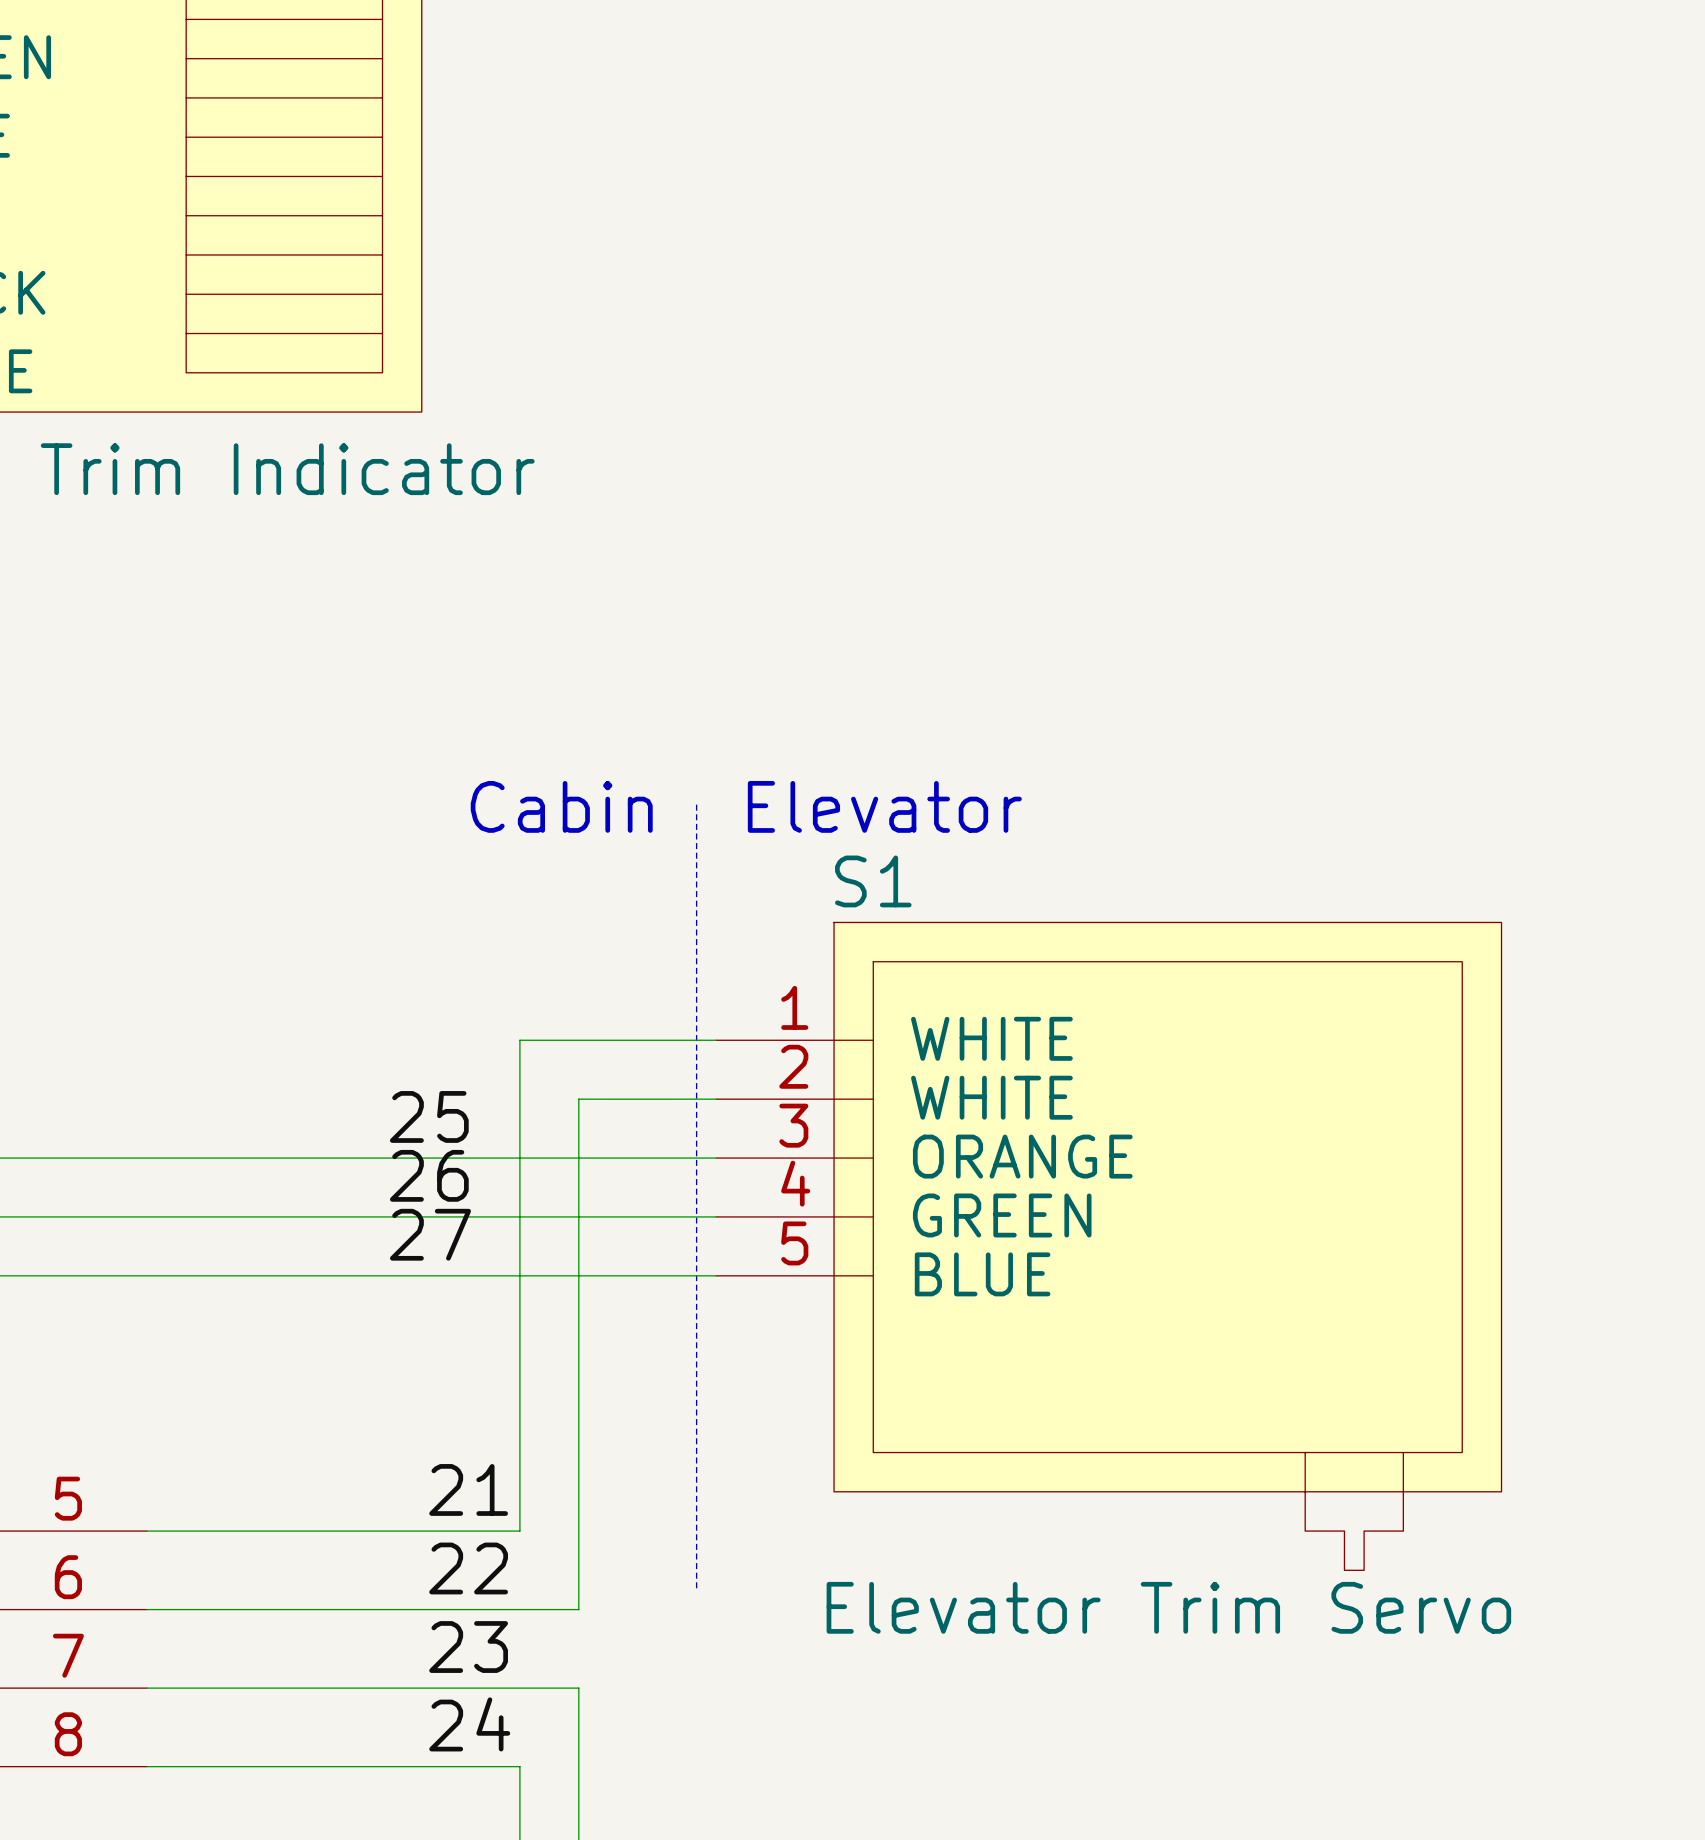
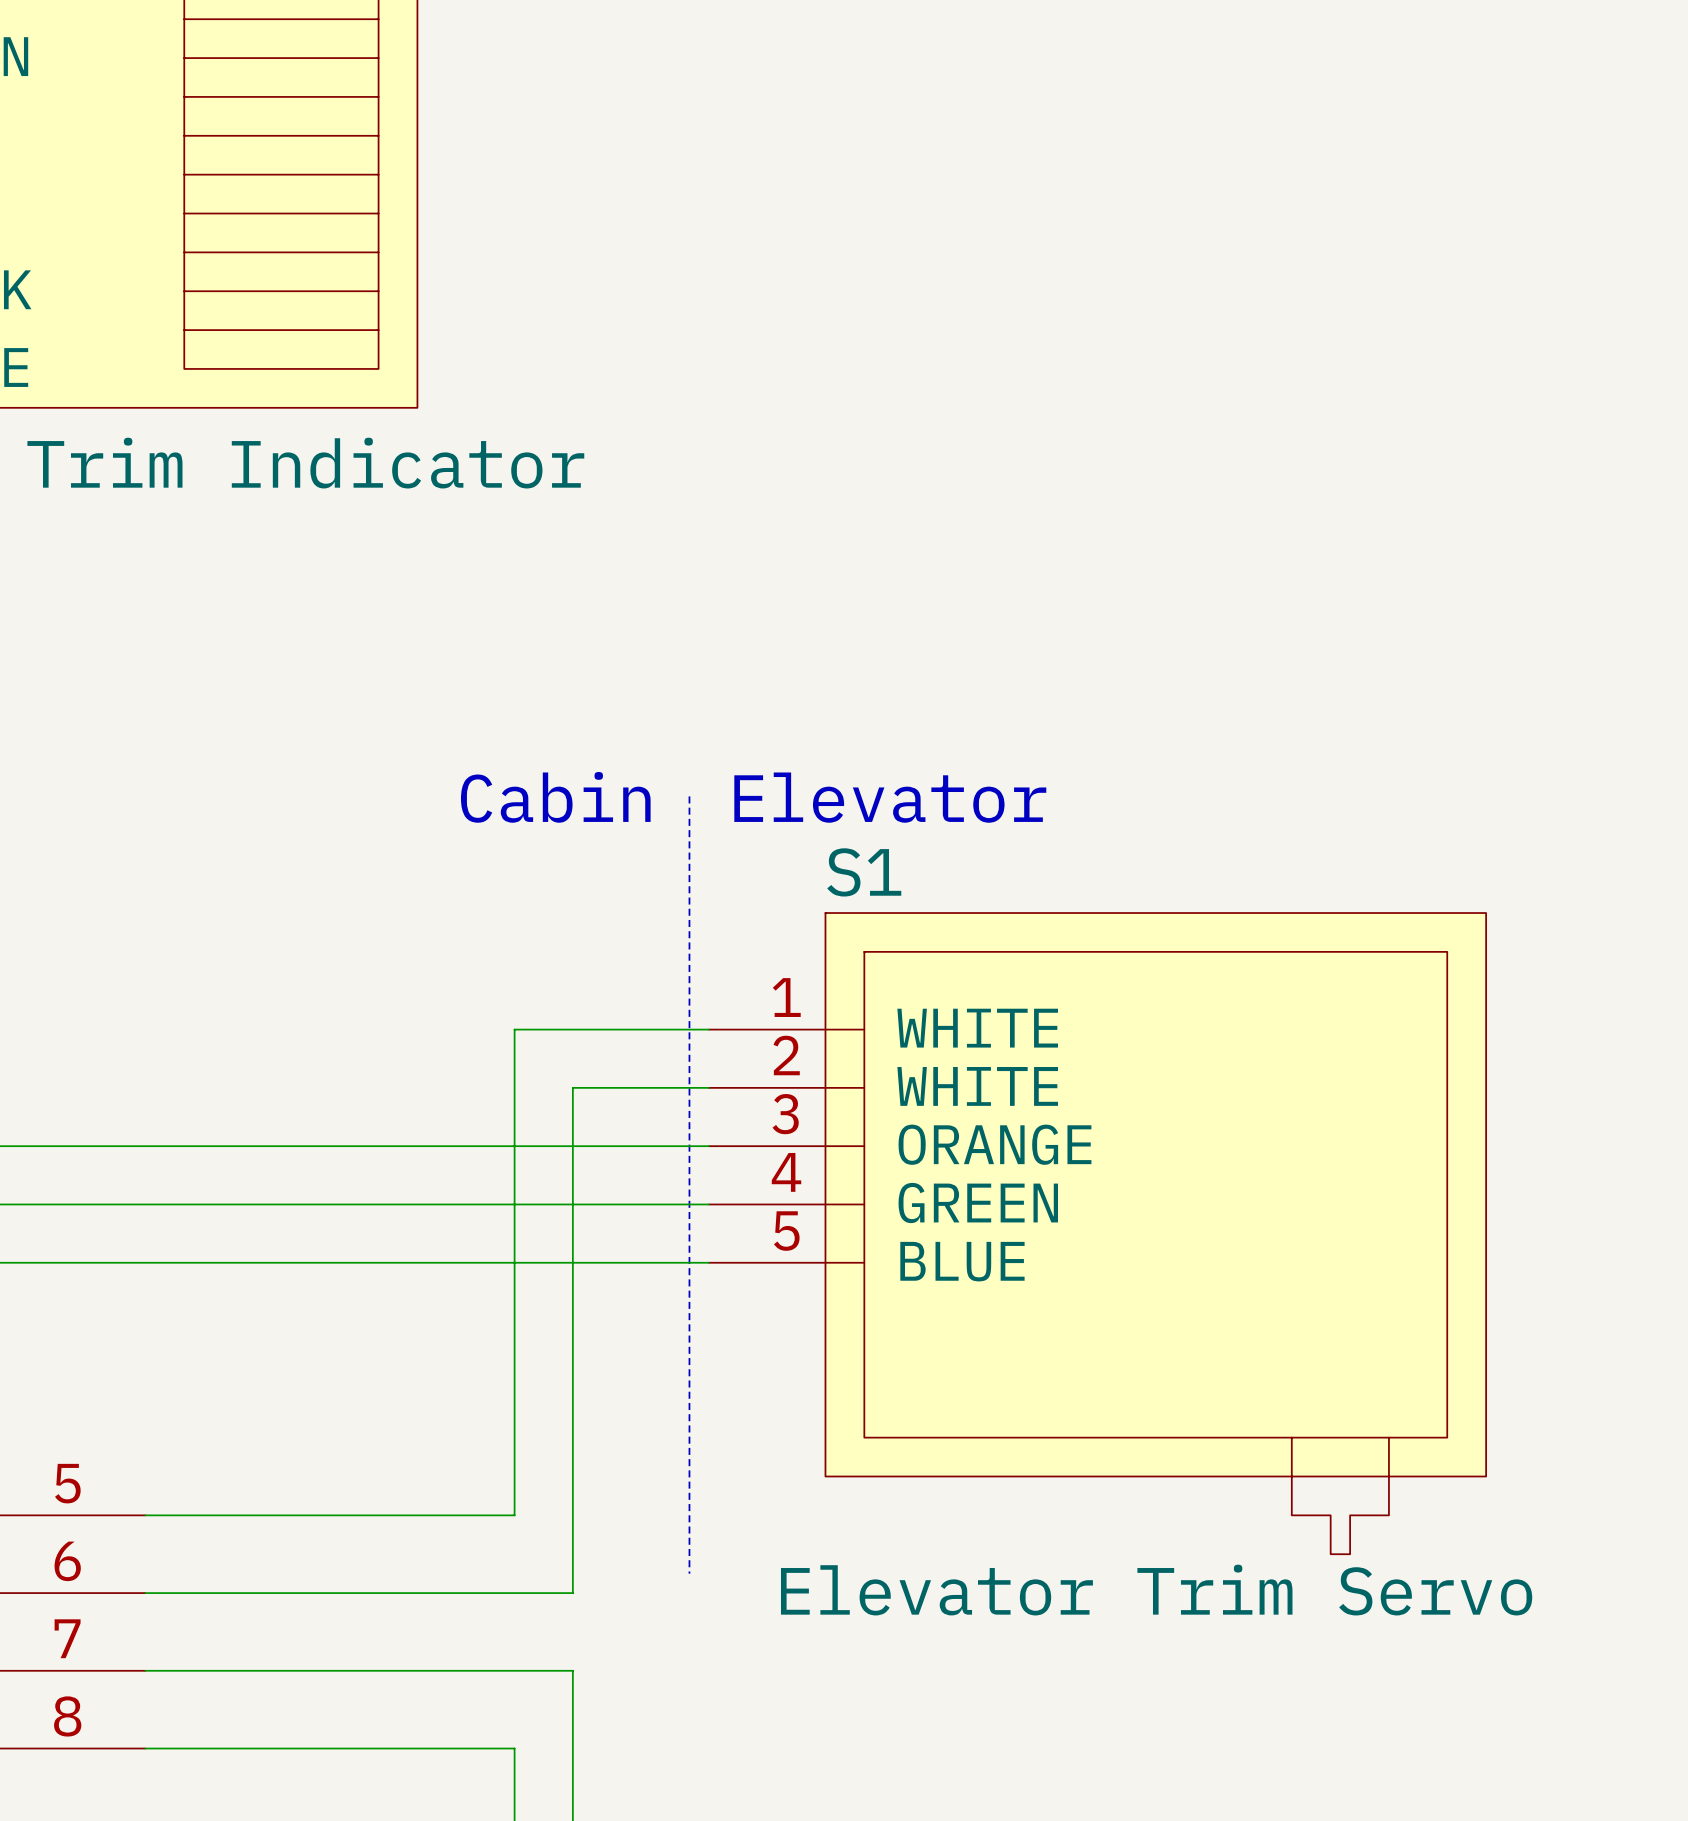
label: 25 (429, 1116) -> none
label: 26 (429, 1175) -> none
label: 27 (430, 1234) -> none
label: 21 (468, 1489) -> none
label: 22 (468, 1568) -> none
label: 23 (468, 1647) -> none
label: 24 (469, 1724) -> none

